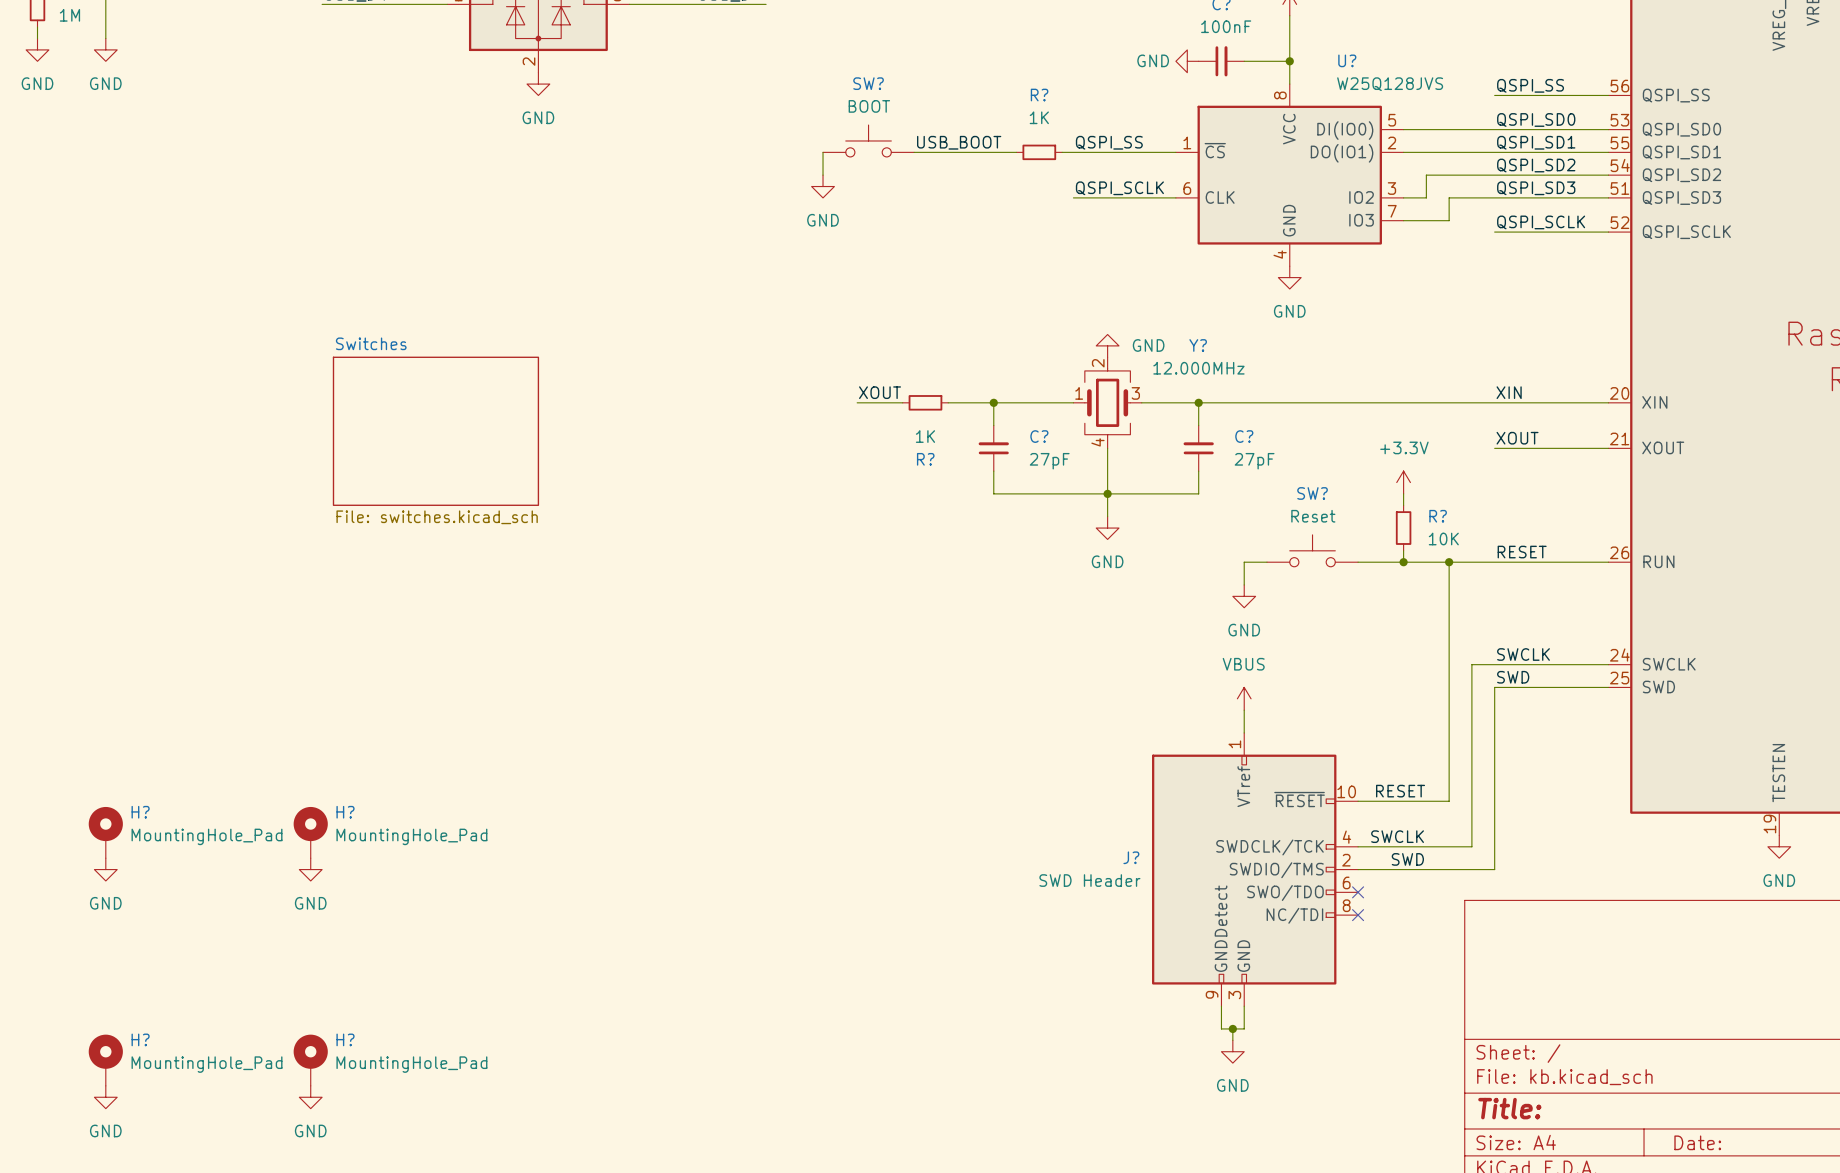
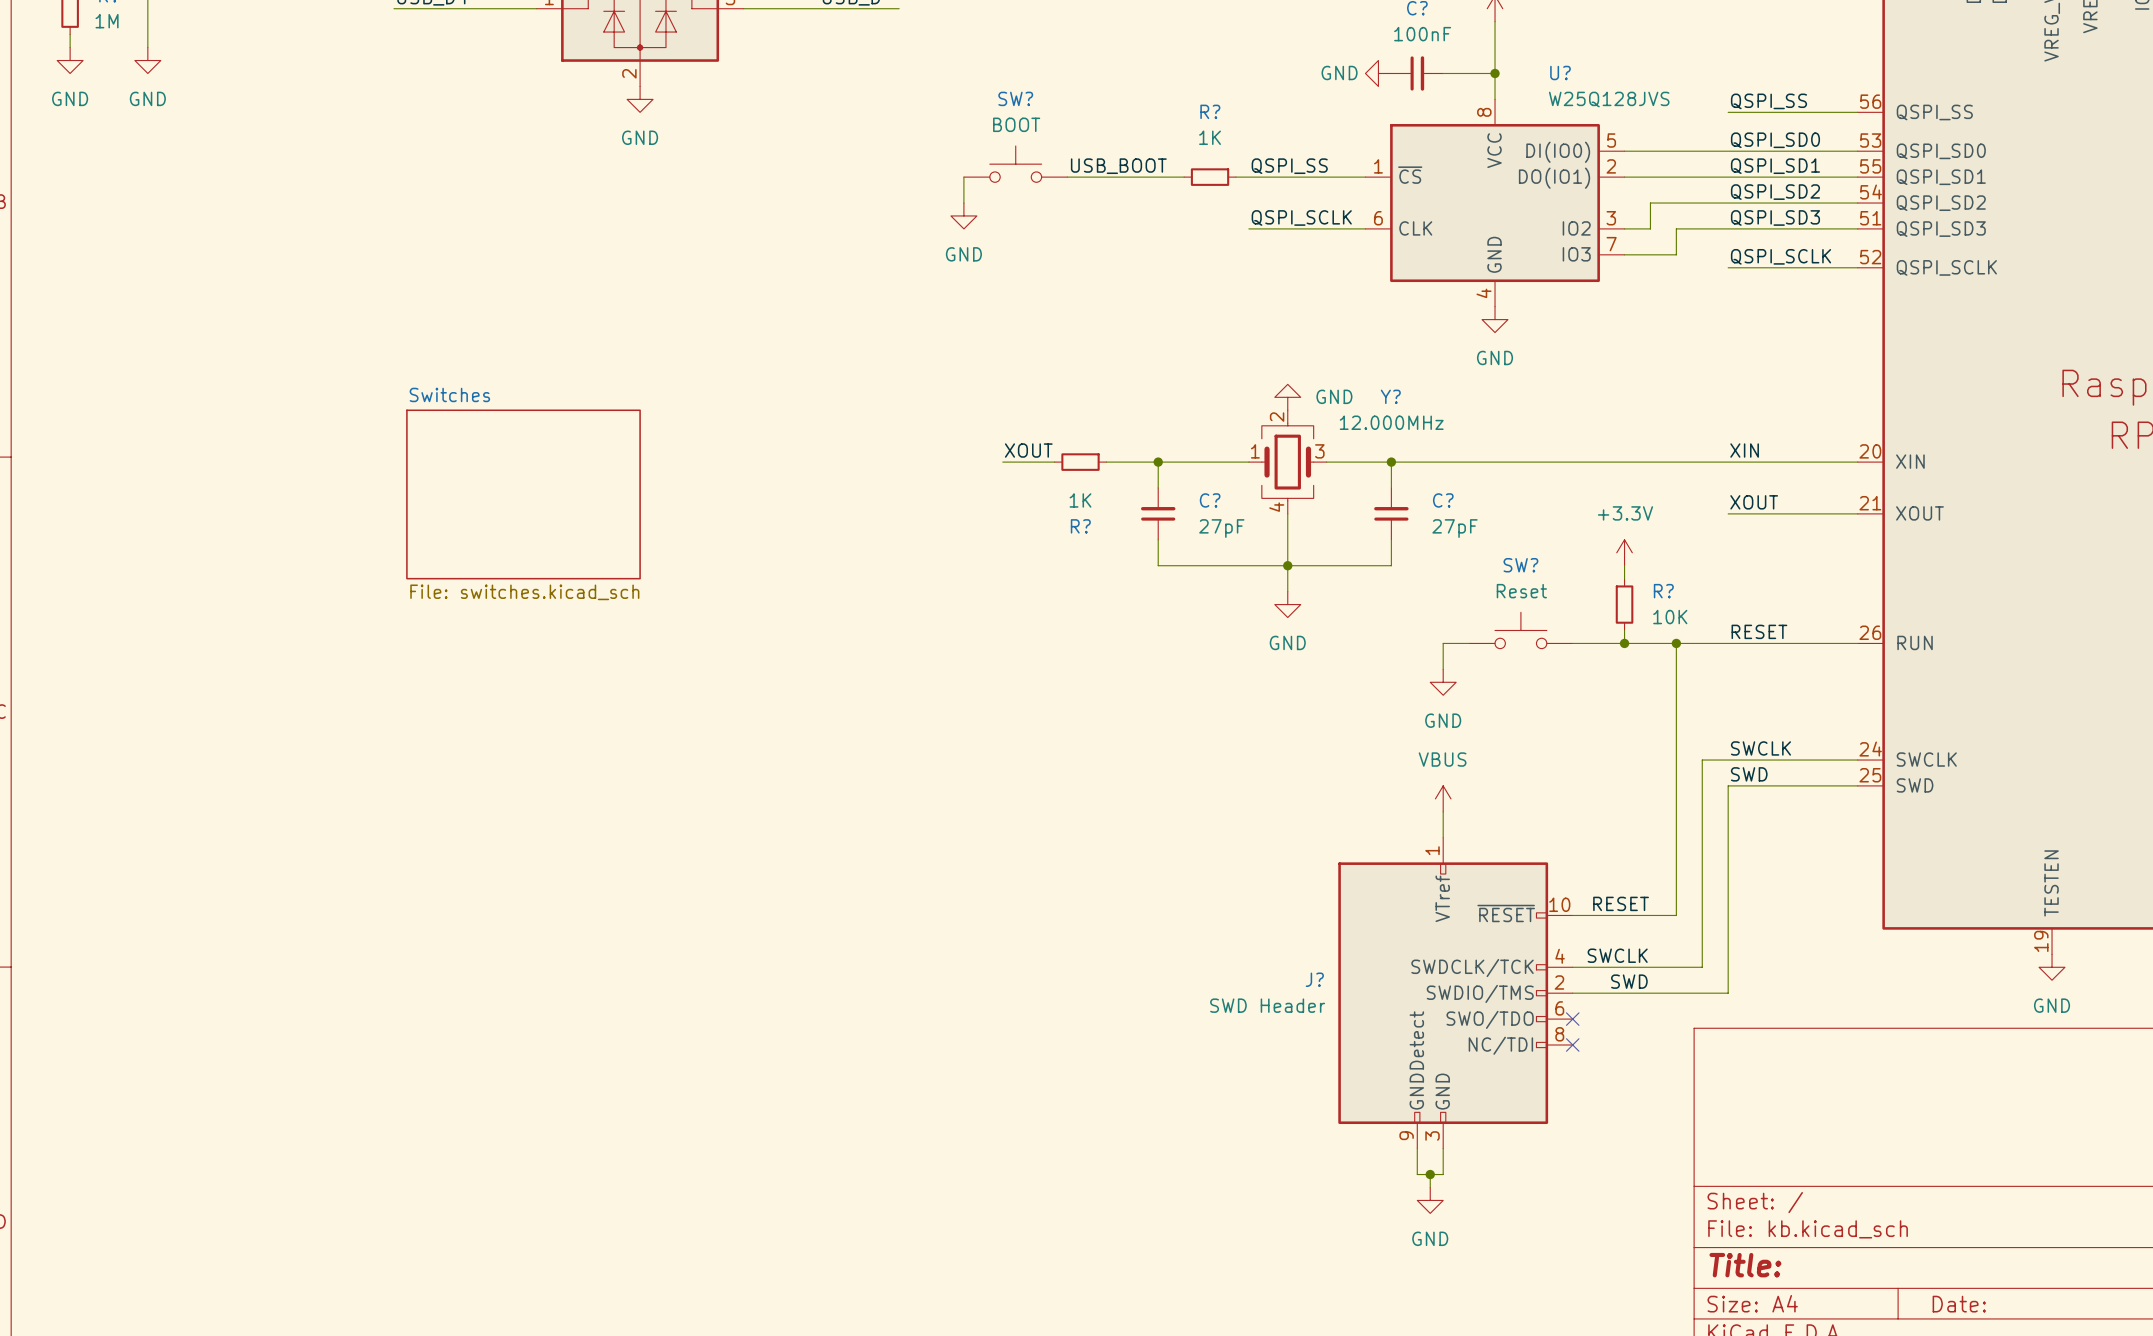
H?: MountingHole_Pad (105, 832) -> none
H?: MountingHole_Pad (310, 832) -> none
power symbol: GND (105, 869) -> none
power symbol: GND (310, 869) -> none
H?: MountingHole_Pad (105, 1060) -> none
H?: MountingHole_Pad (310, 1060) -> none
power symbol: GND (105, 1097) -> none
power symbol: GND (310, 1097) -> none

